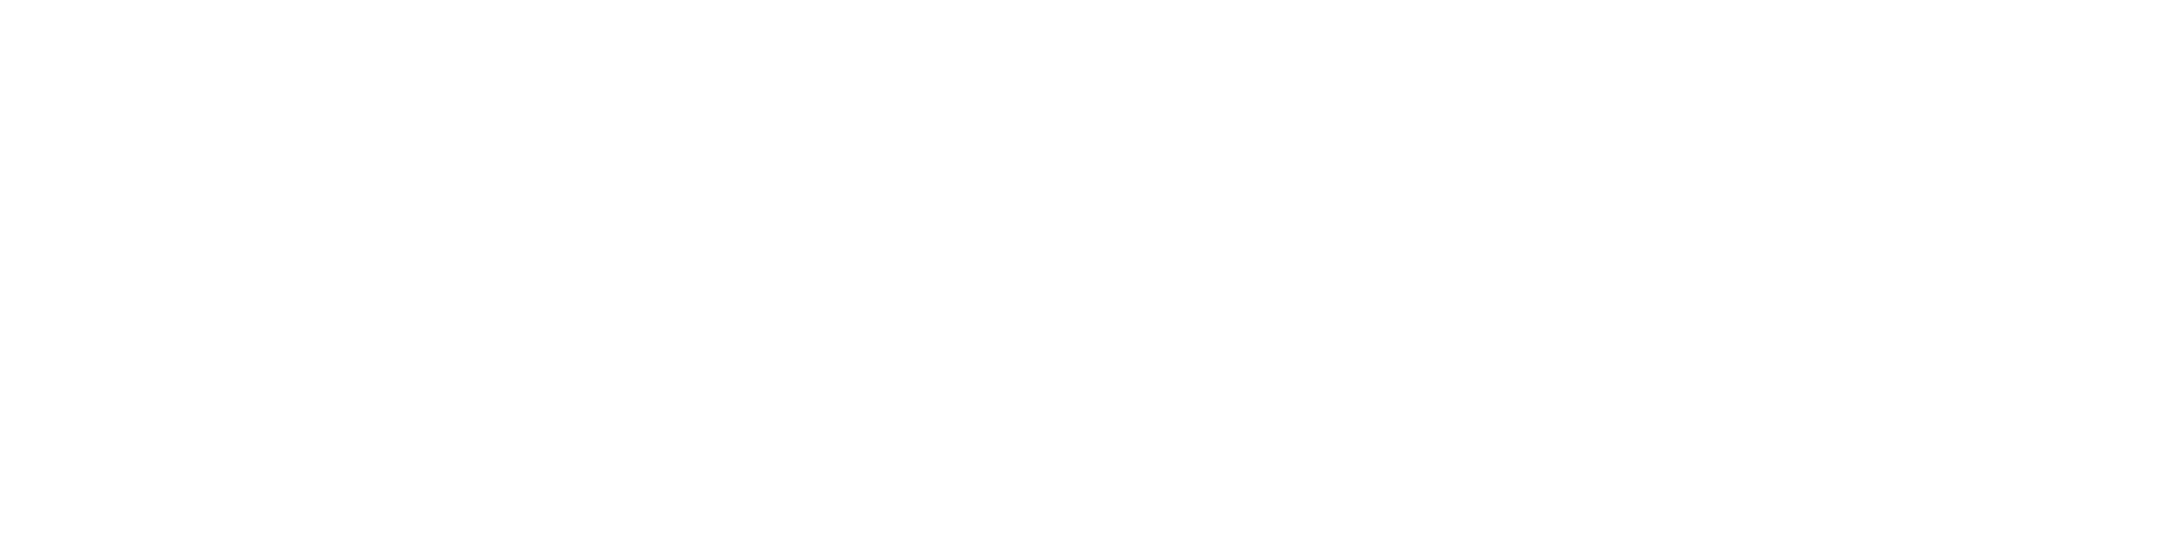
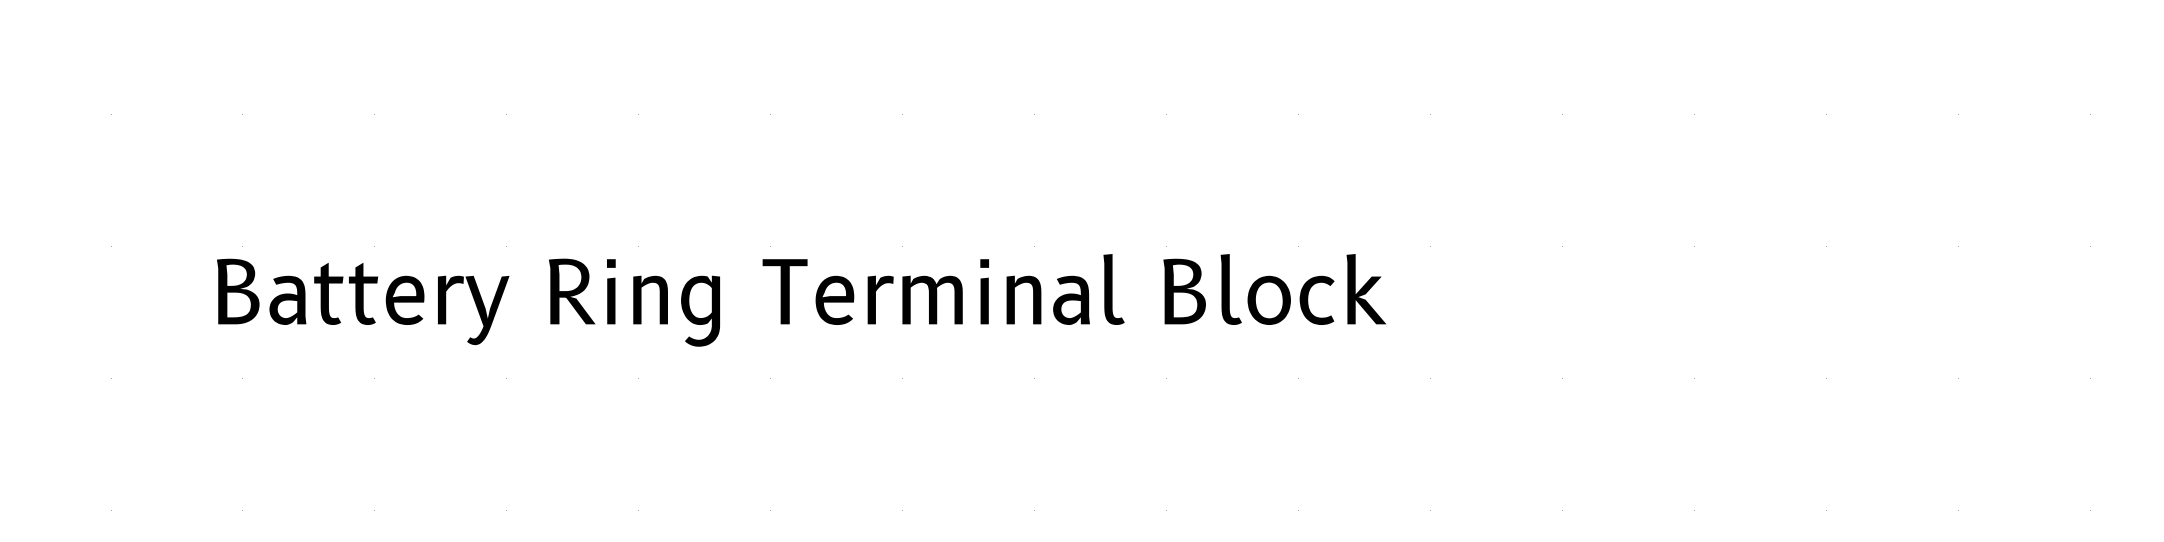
text: none -> Battery Ring Terminal Block (801, 300)

